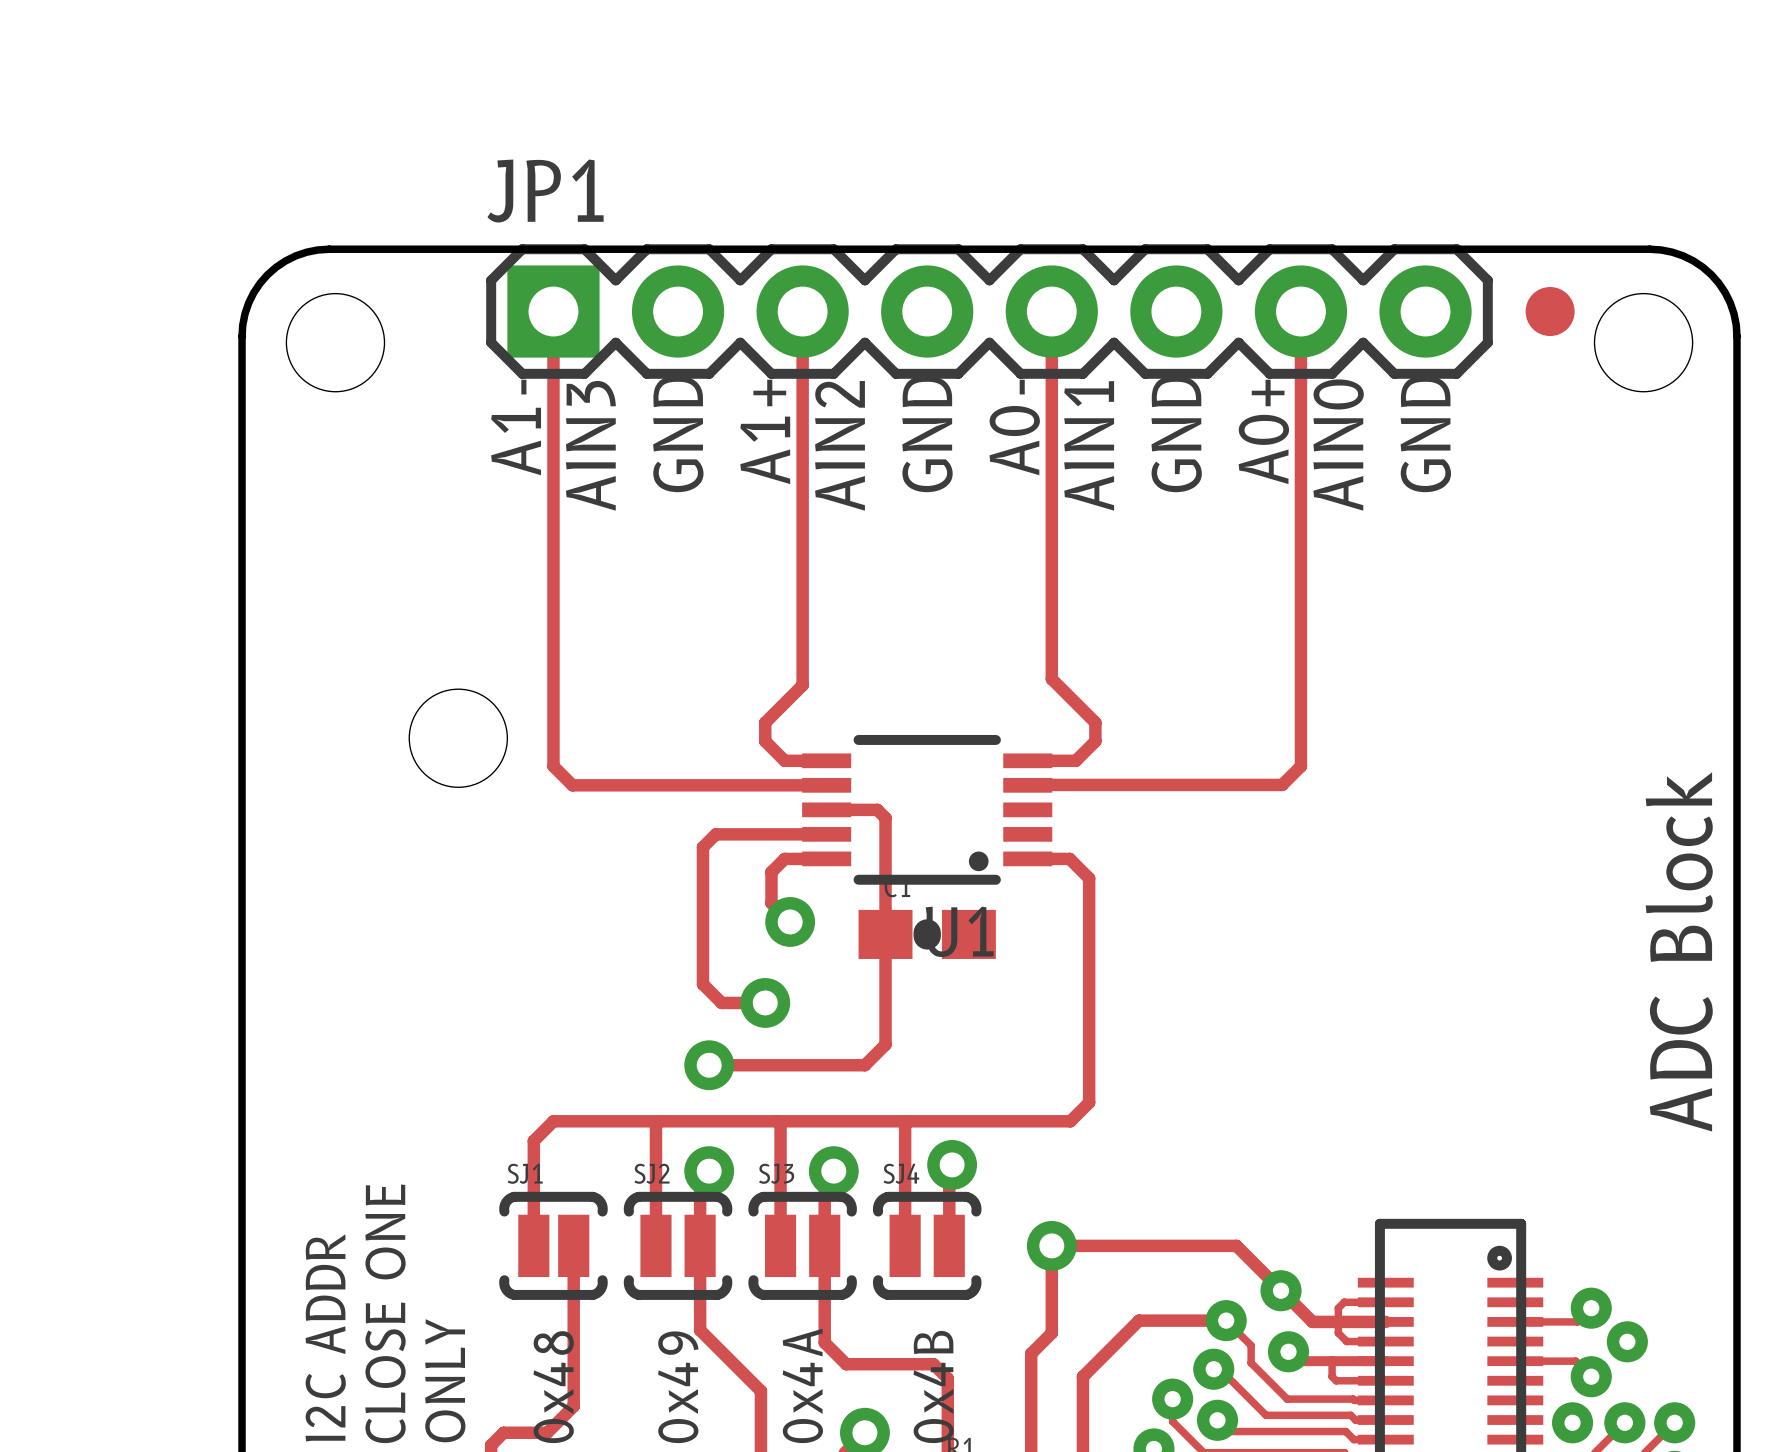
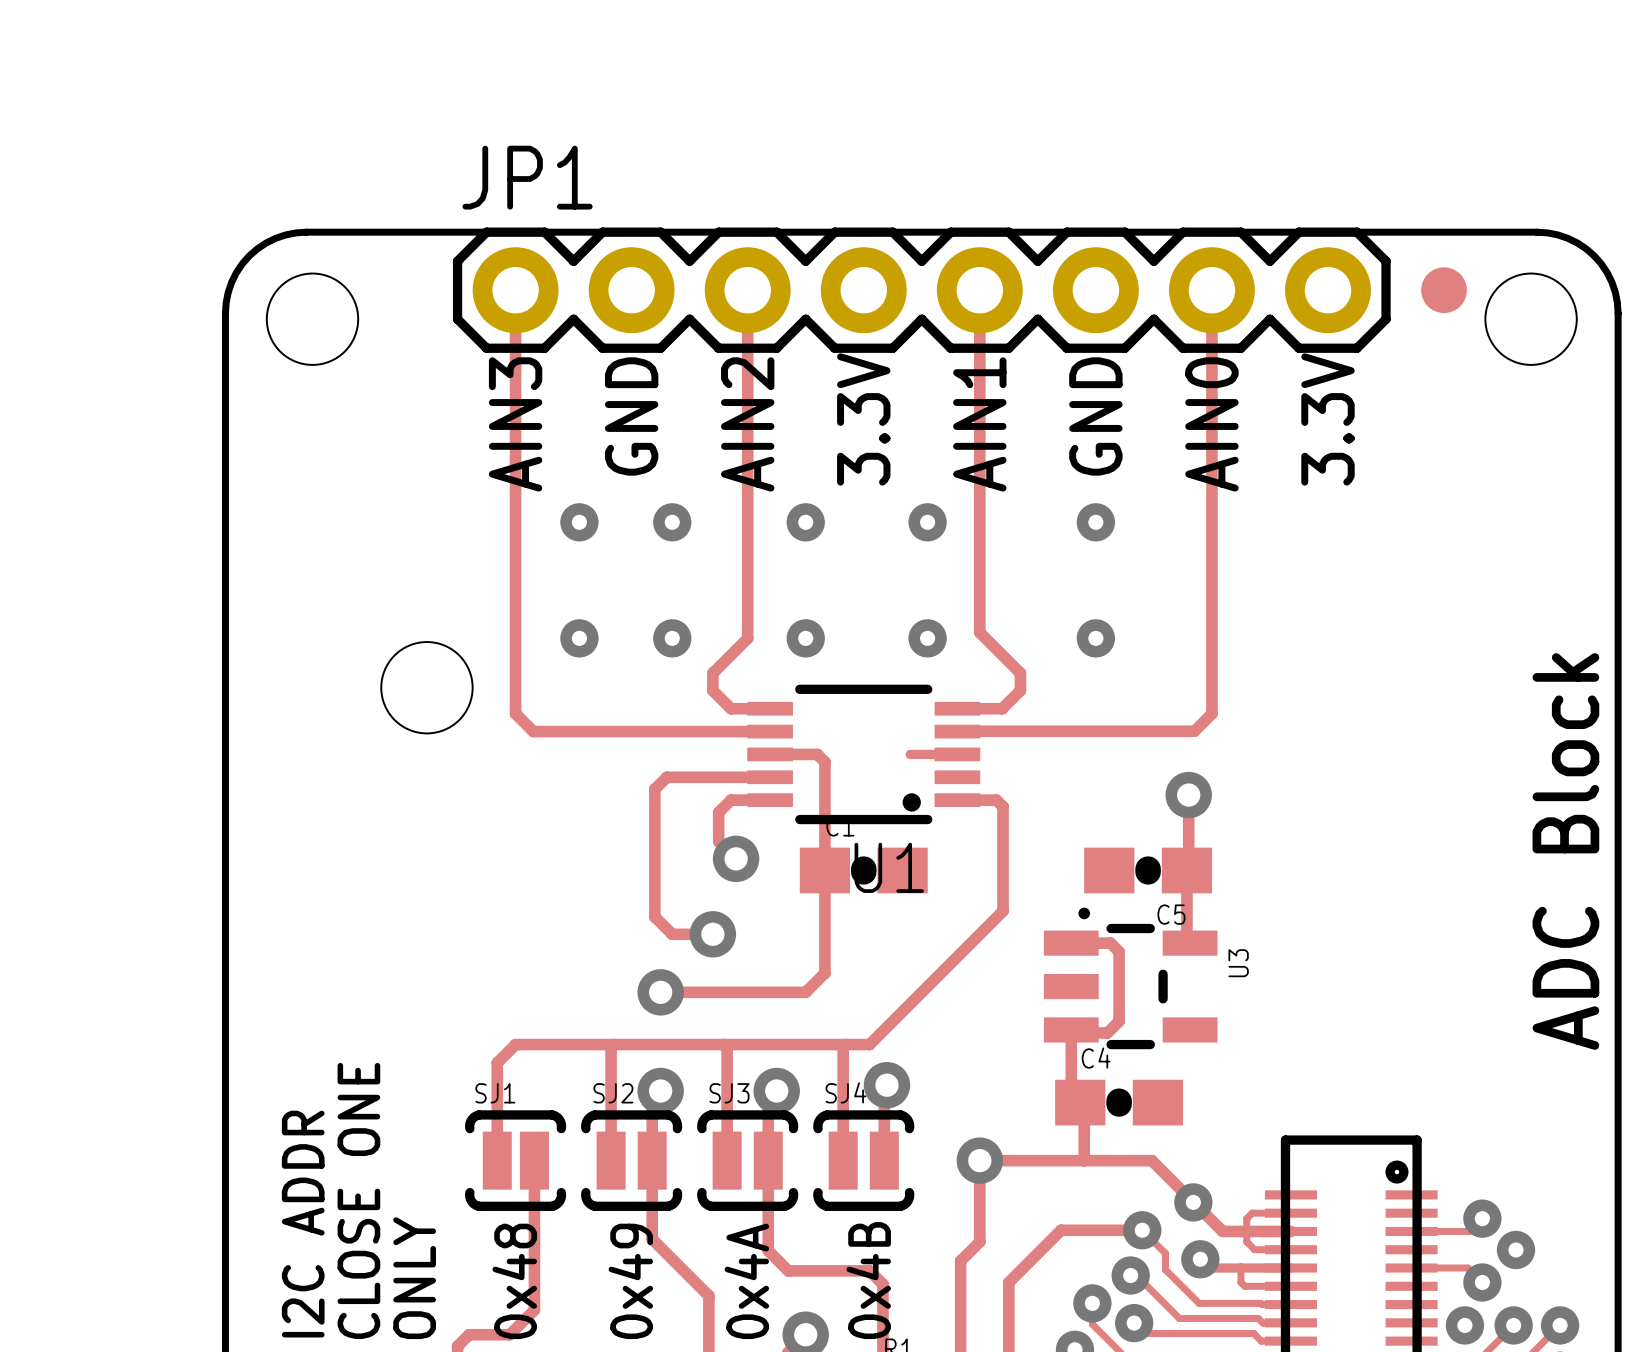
JP1 footprint: [486, 244, 1493, 379] -> [452, 227, 1391, 353]
text: A1- (516, 427) -> none
text: A0- (1014, 427) -> none
text: A1+ (765, 431) -> none
text: A0+ (1263, 431) -> none
text: GND (927, 433) -> 3.3V (863, 419)
text: GND (1425, 433) -> 3.3V (1327, 419)
text position: AIN3 (590, 445) -> AIN3 (515, 424)
text position: AIN2 (840, 445) -> AIN2 (747, 424)
text position: AIN1 (1089, 445) -> AIN1 (979, 424)
text position: AIN0 (1338, 445) -> AIN0 (1211, 424)
via: none -> (579, 522)
via: none -> (672, 522)
via: none -> (805, 522)
via: none -> (927, 522)
via: none -> (1095, 522)
via: none -> (579, 638)
via: none -> (672, 638)
via: none -> (805, 638)
via: none -> (927, 638)
via: none -> (1095, 638)
track: none -> (910, 754) (957, 754)
track: none -> (1188, 795) (1186, 939) (1190, 943)
via: none -> (1188, 795)
track: (1076, 865) (1089, 878) (1089, 1102) (1070, 1121) (933, 1121) -> (1003, 806) (1003, 911) (869, 1044)
C5: none -> (1148, 870)
track: none -> (1071, 943) (1110, 943) (1119, 951) (1119, 1021) (1107, 1032) (1071, 1032)
U3: none -> (1130, 978)
track: none -> (1071, 1029) (1071, 1093) (1084, 1106) (1084, 1160)
C4: none -> (1119, 1102)

